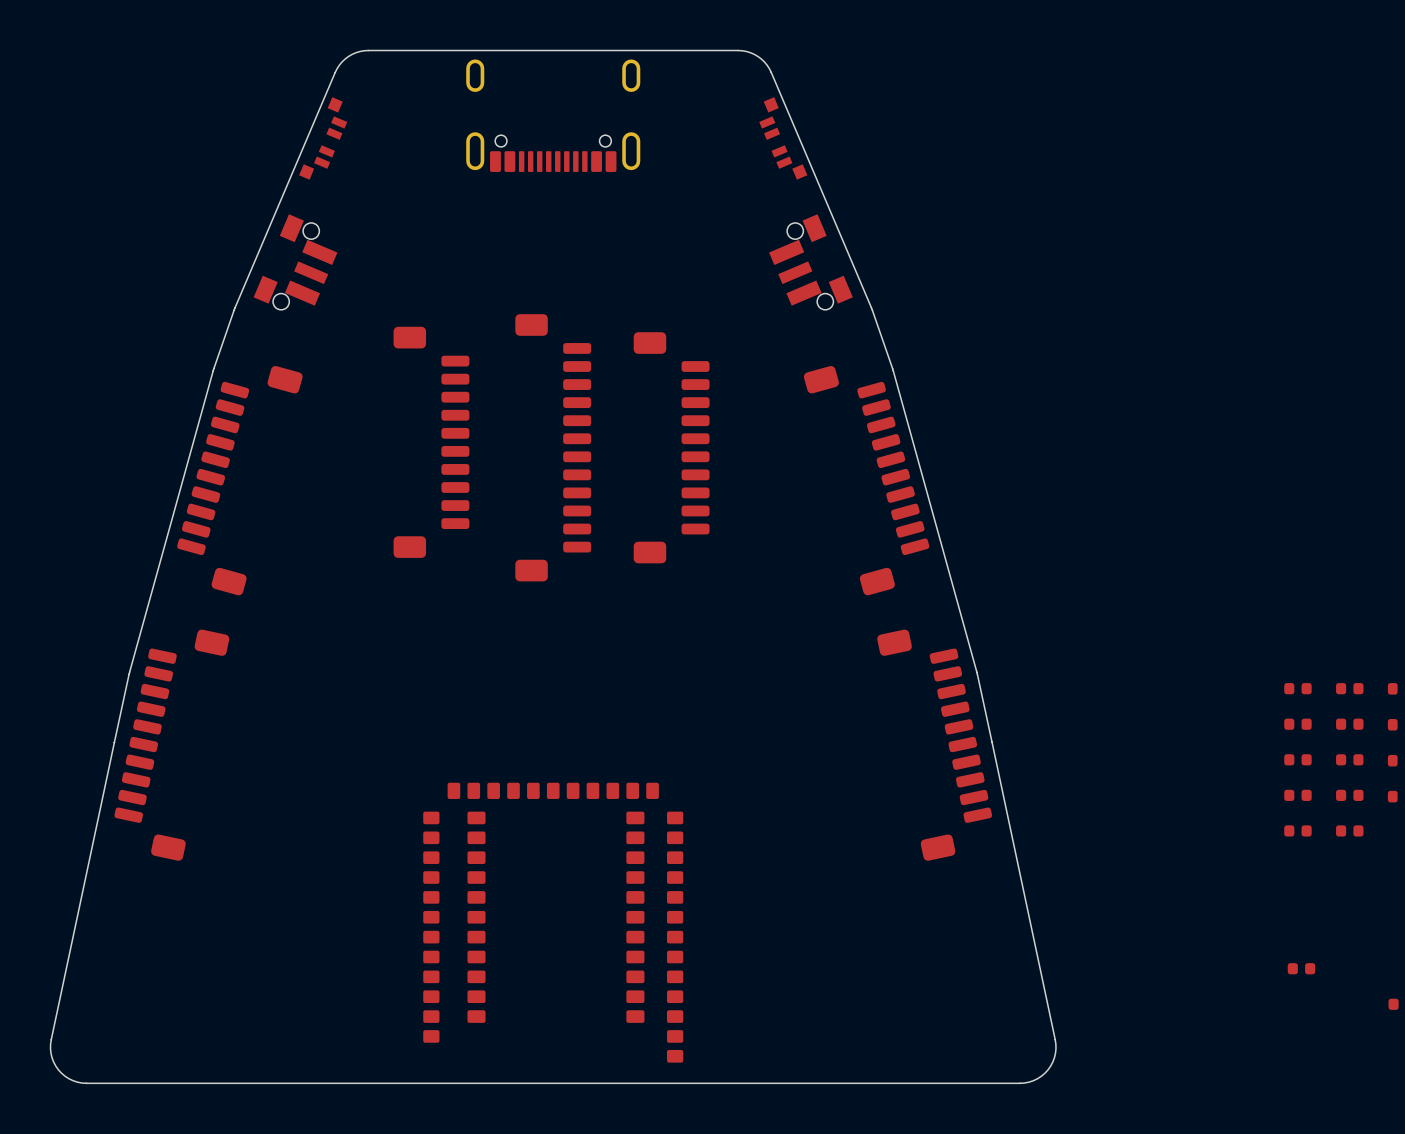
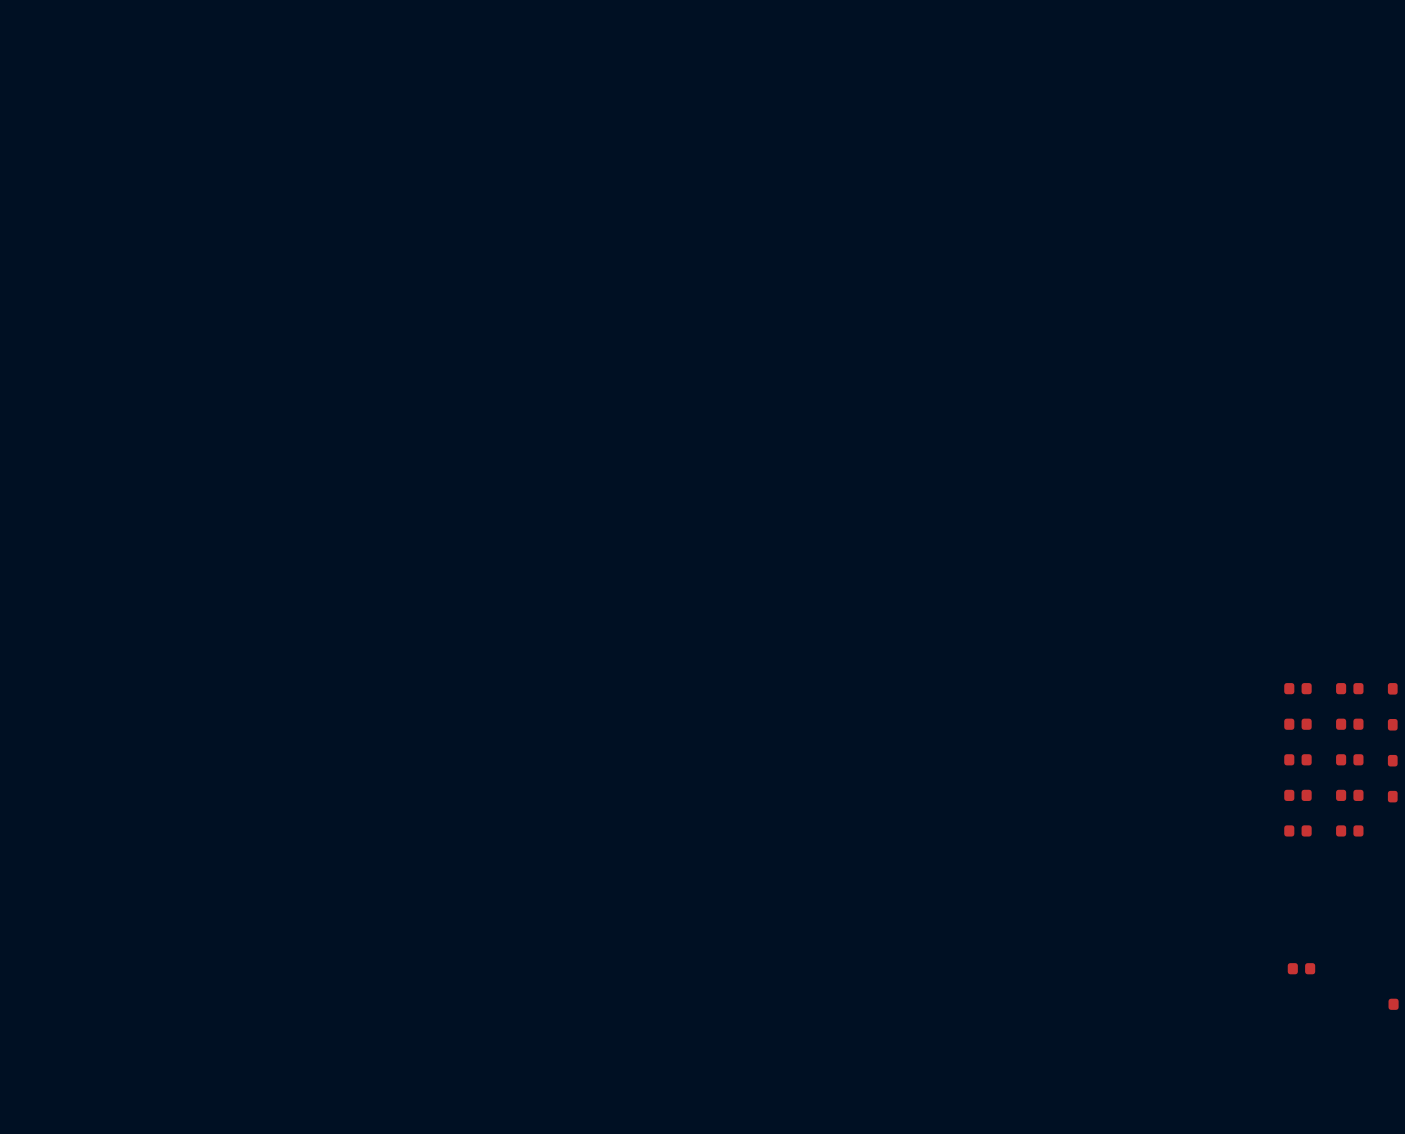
board edge: (738, 50) (368, 50) (352, 54) (339, 65) (235, 307) (213, 368) (129, 672) (51, 1039) (50, 1048) (53, 1062) (65, 1076) (73, 1080) (86, 1083) (1019, 1083) (1037, 1078) (1050, 1066) (1055, 1053) (1055, 1039) (977, 674) (892, 369) (871, 307) (771, 72) (757, 56) (738, 50) -> none
part: (553, 115) -> none
part: (323, 138) -> none
part: (783, 138) -> none
part: (295, 262) -> none
part: (810, 262) -> none
part: (431, 442) -> none
part: (553, 447) -> none
part: (671, 447) -> none
part: (239, 480) -> none
part: (866, 480) -> none
part: (171, 745) -> none
part: (934, 745) -> none
part: (553, 922) -> none

